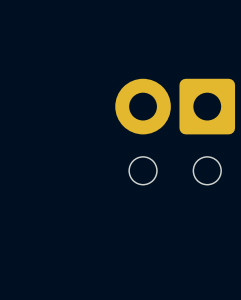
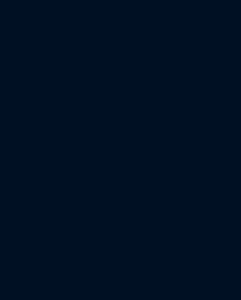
part: (175, 131) -> none

